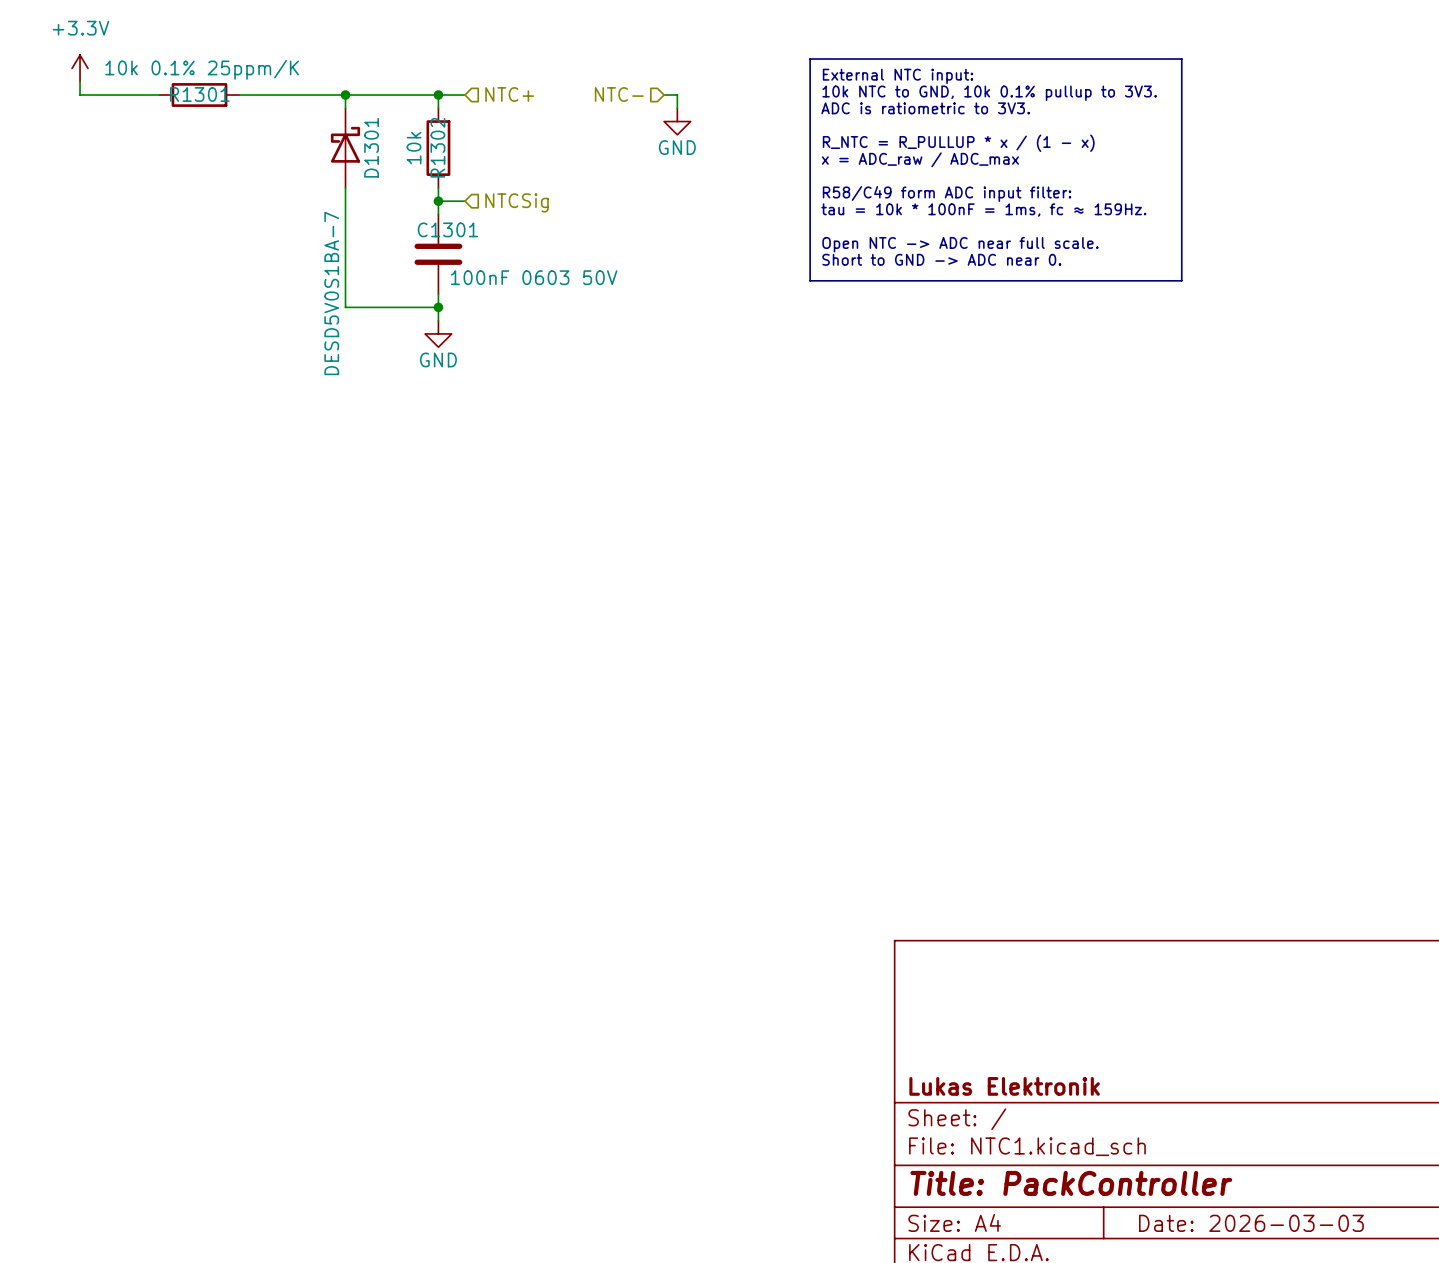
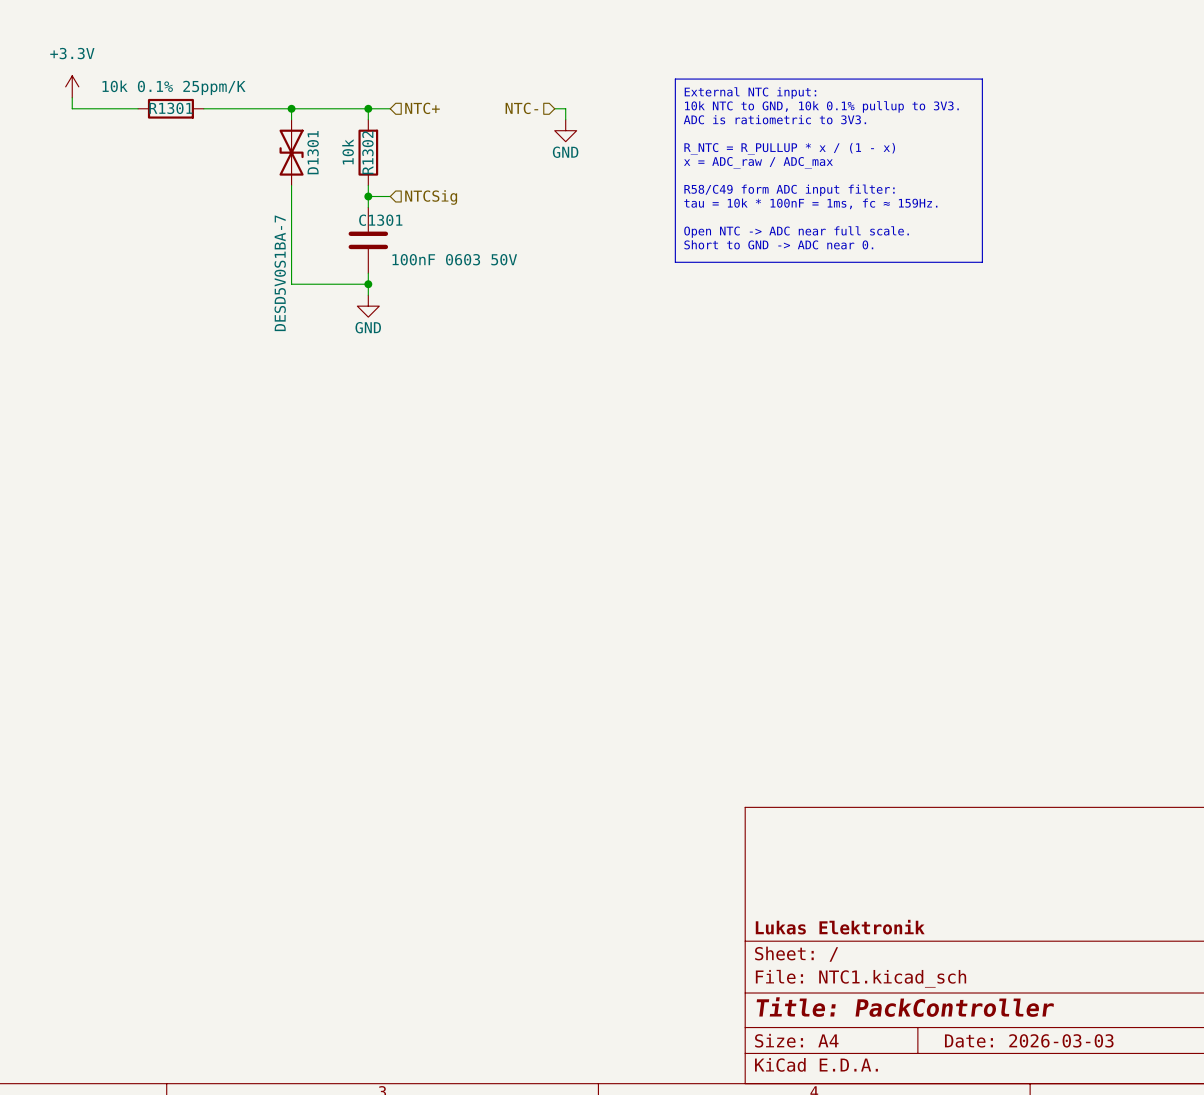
D1301 symbol: [330, 108, 361, 188] -> [279, 119, 304, 186]

